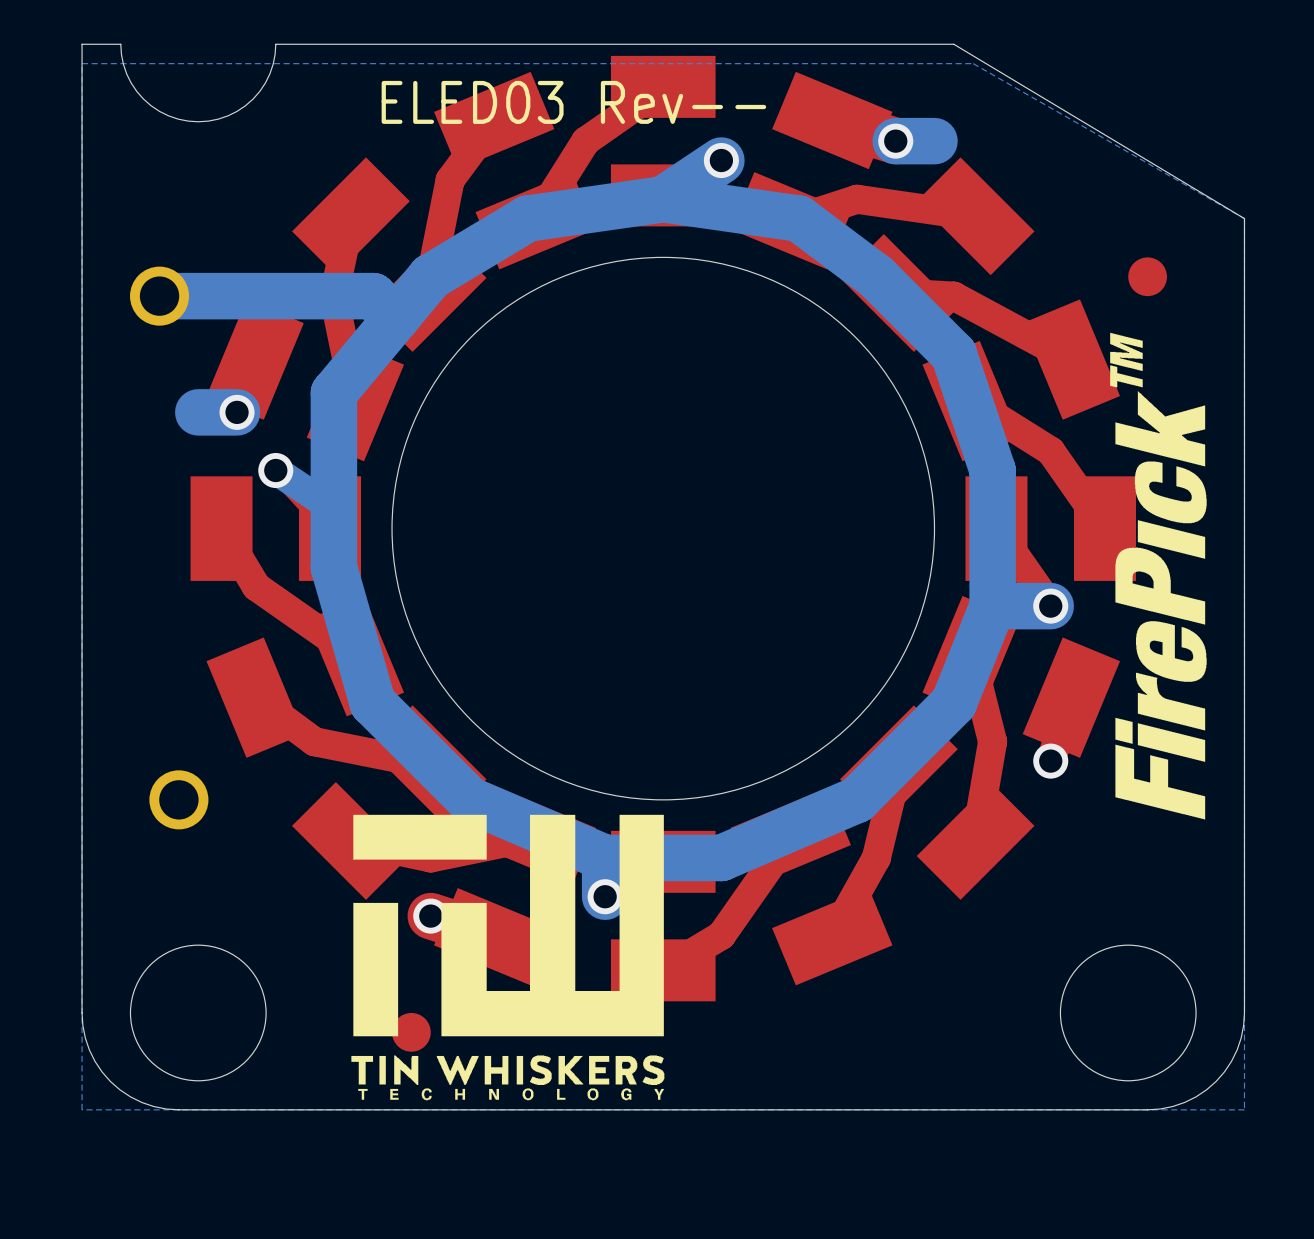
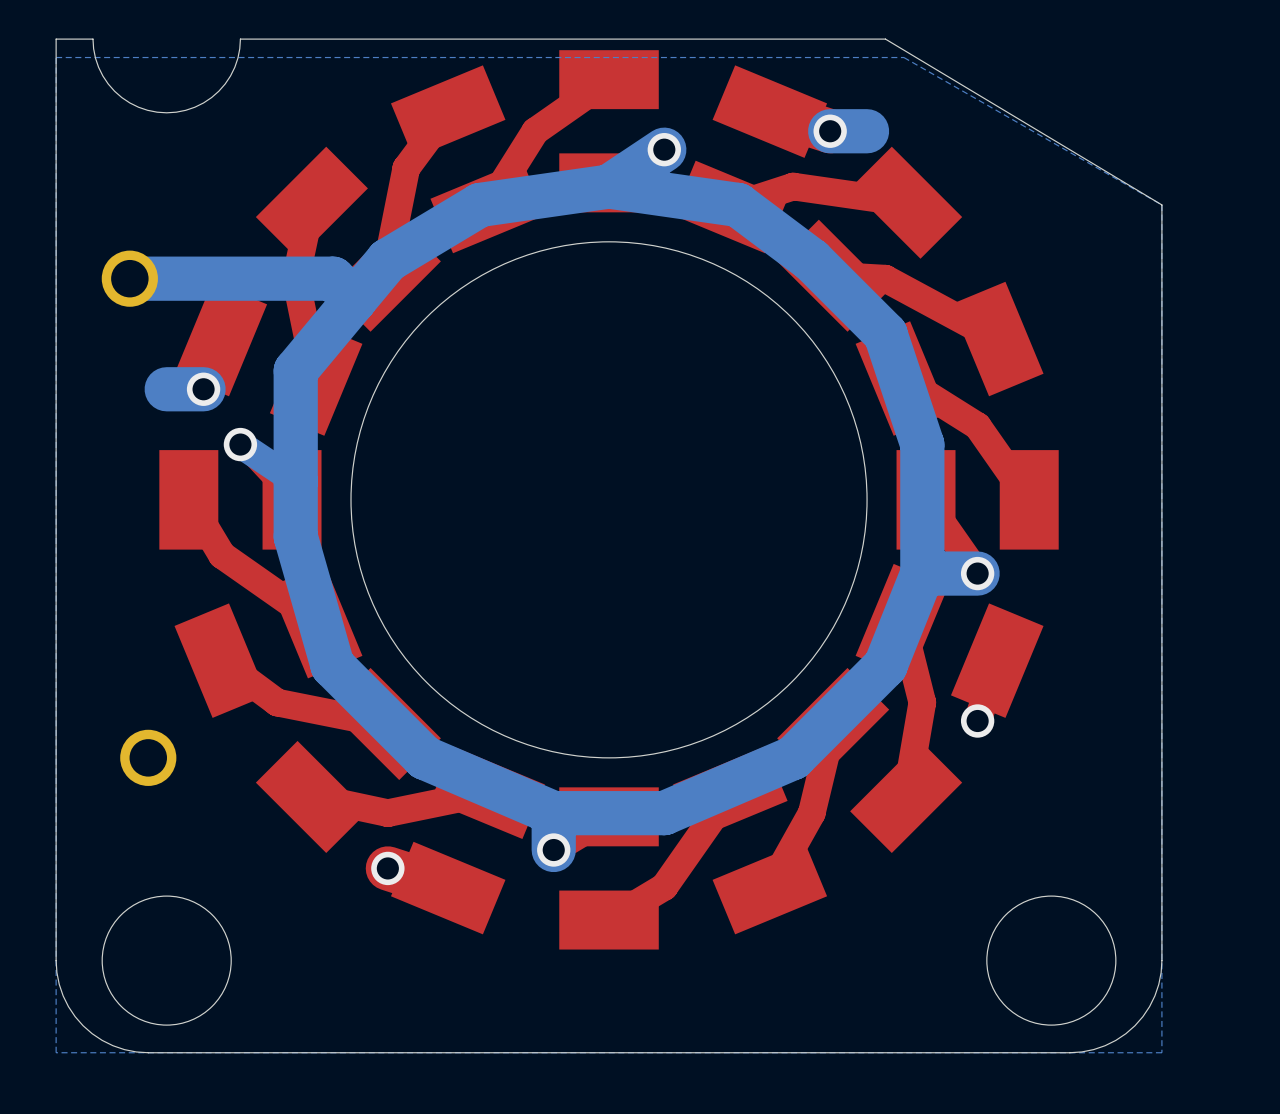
text: ELED03 Rev-- (573, 102) -> none
part: (1147, 276) -> none
drawing: [1110, 332, 1207, 820] -> none
drawing: [351, 814, 665, 1101] -> none
part: (411, 1032) -> none

